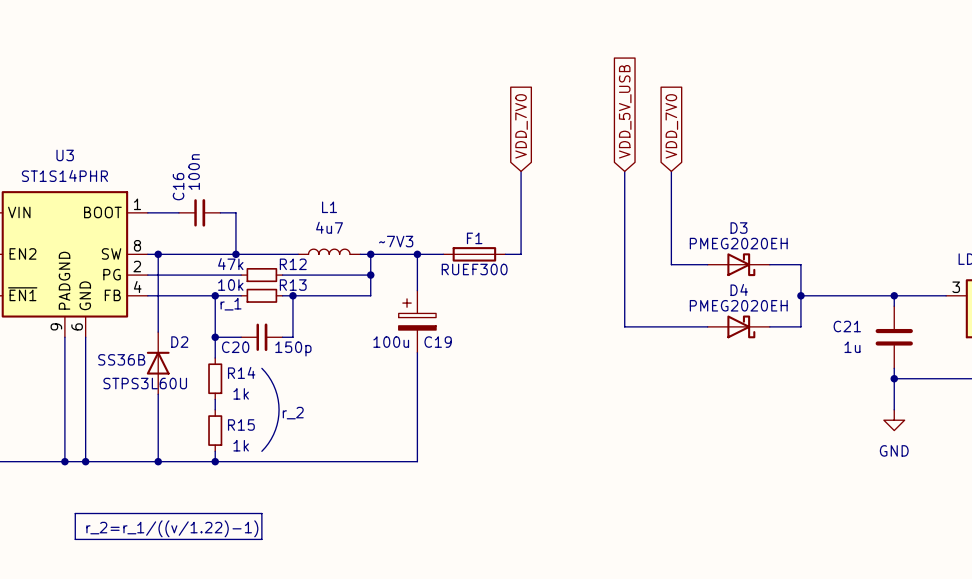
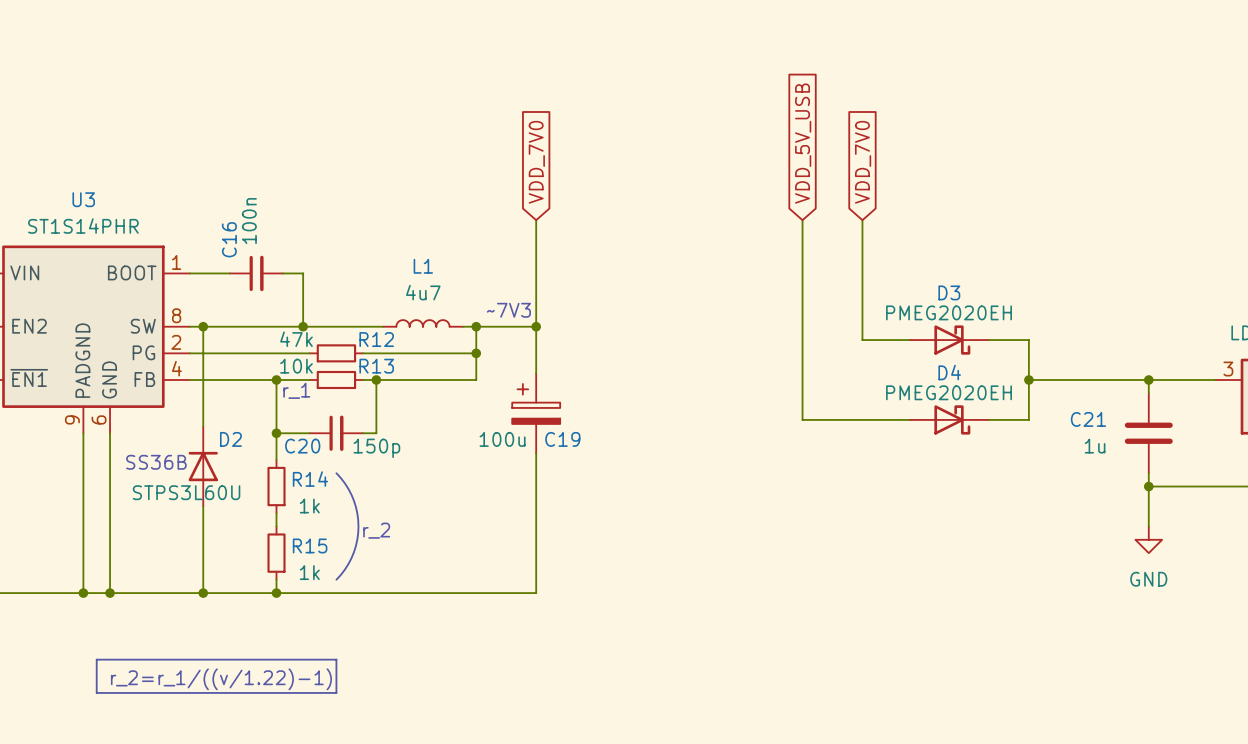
global label position: VDD_7V0 (521, 126) -> VDD_7V0 (536, 162)
wire: (521, 171) (521, 254) (505, 254) -> none
wire: (417, 254) (443, 254) -> (536, 326) (536, 220)
F1: RUEF300 (474, 254) -> none

